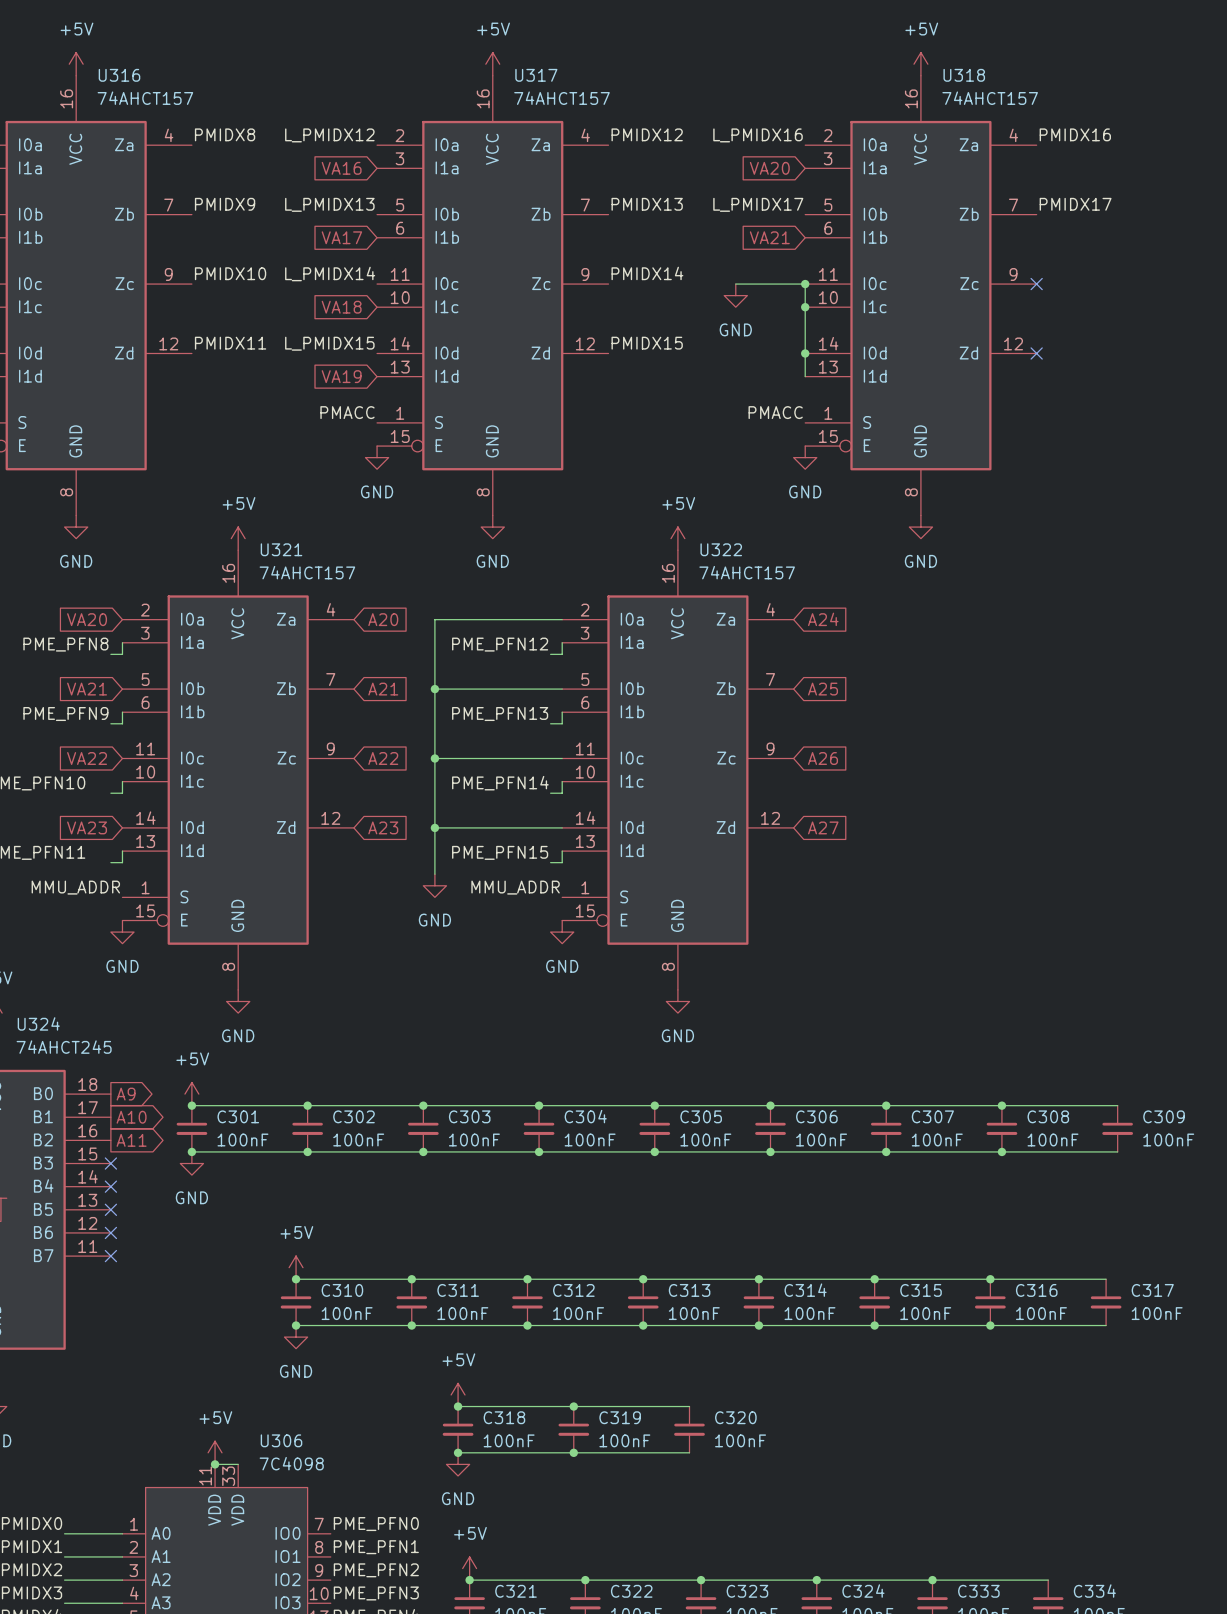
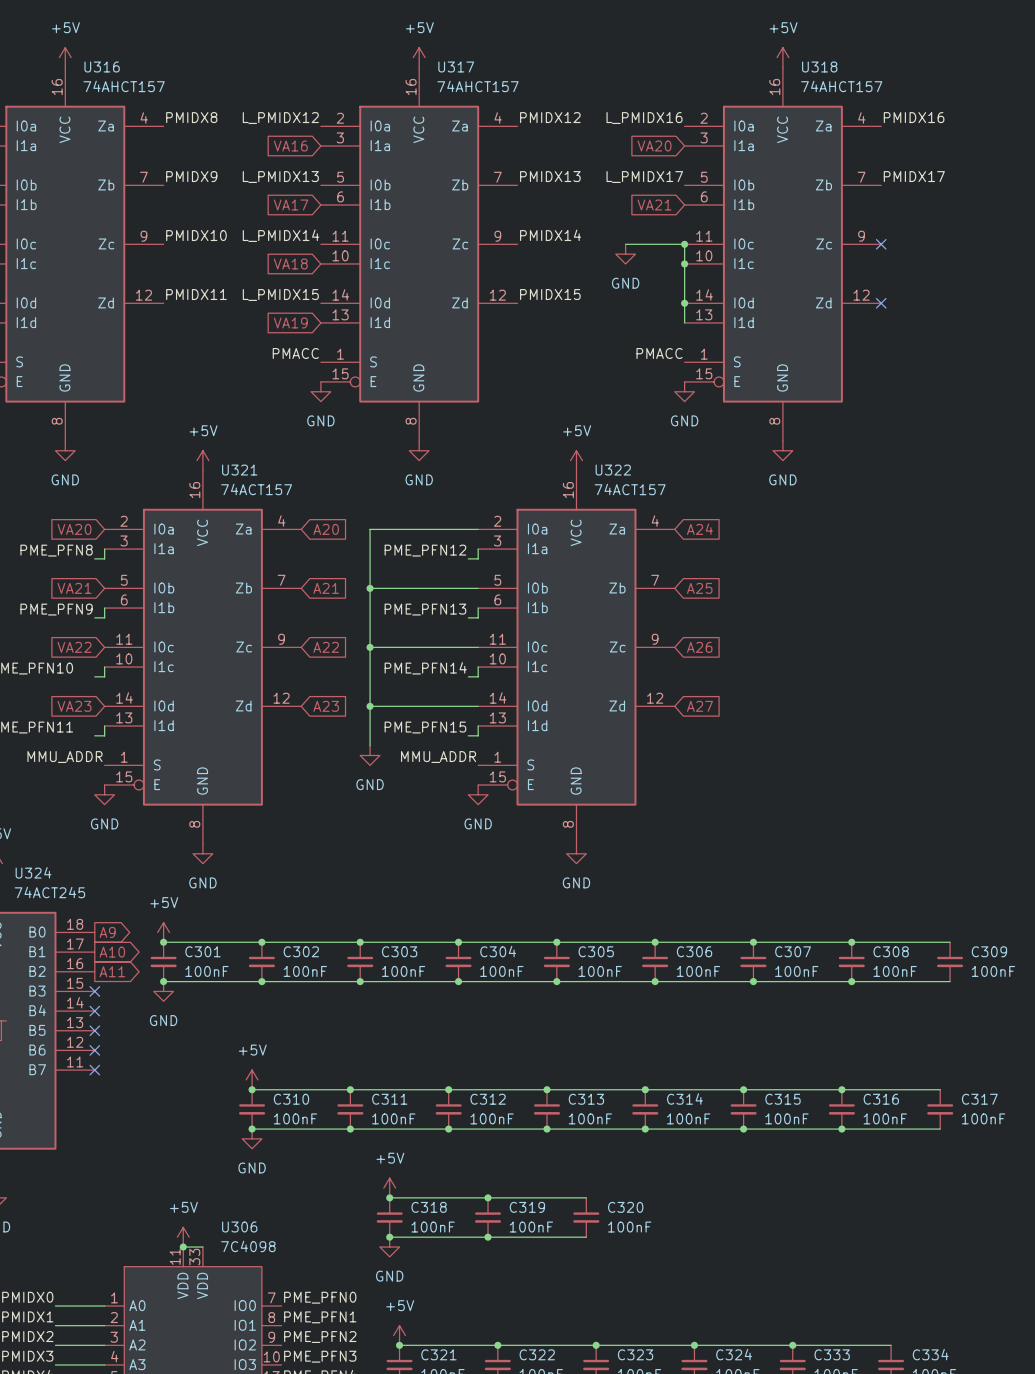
U321 value: 74AHCT157 (307, 572) -> 74ACT157 (256, 489)
U322 value: 74AHCT157 (747, 572) -> 74ACT157 (630, 489)
U324 value: 74AHCT245 (64, 1047) -> 74ACT245 (49, 892)

